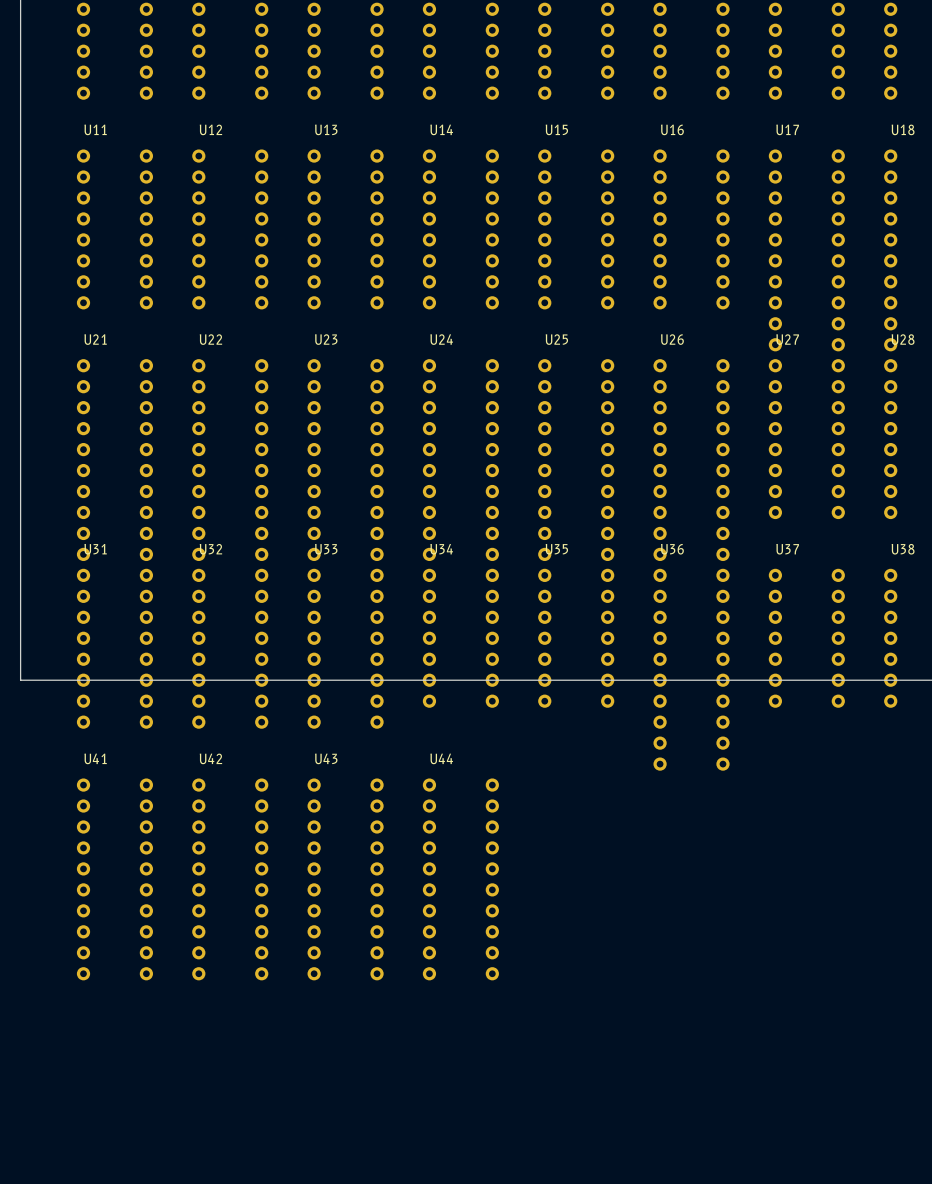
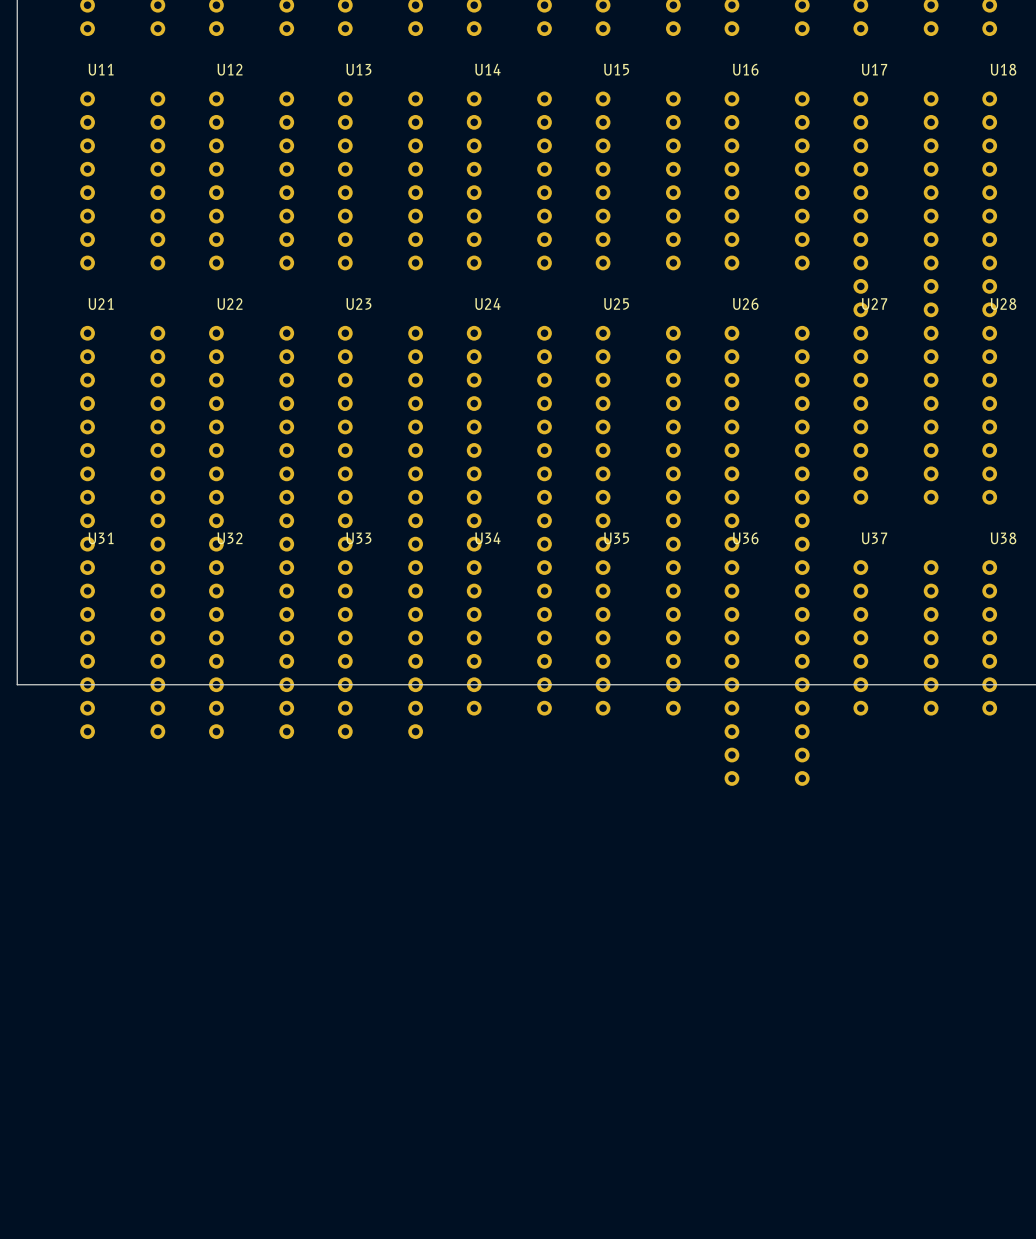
U41: (114, 879) -> none
U42: (230, 879) -> none
U43: (345, 879) -> none
U44: (460, 879) -> none

